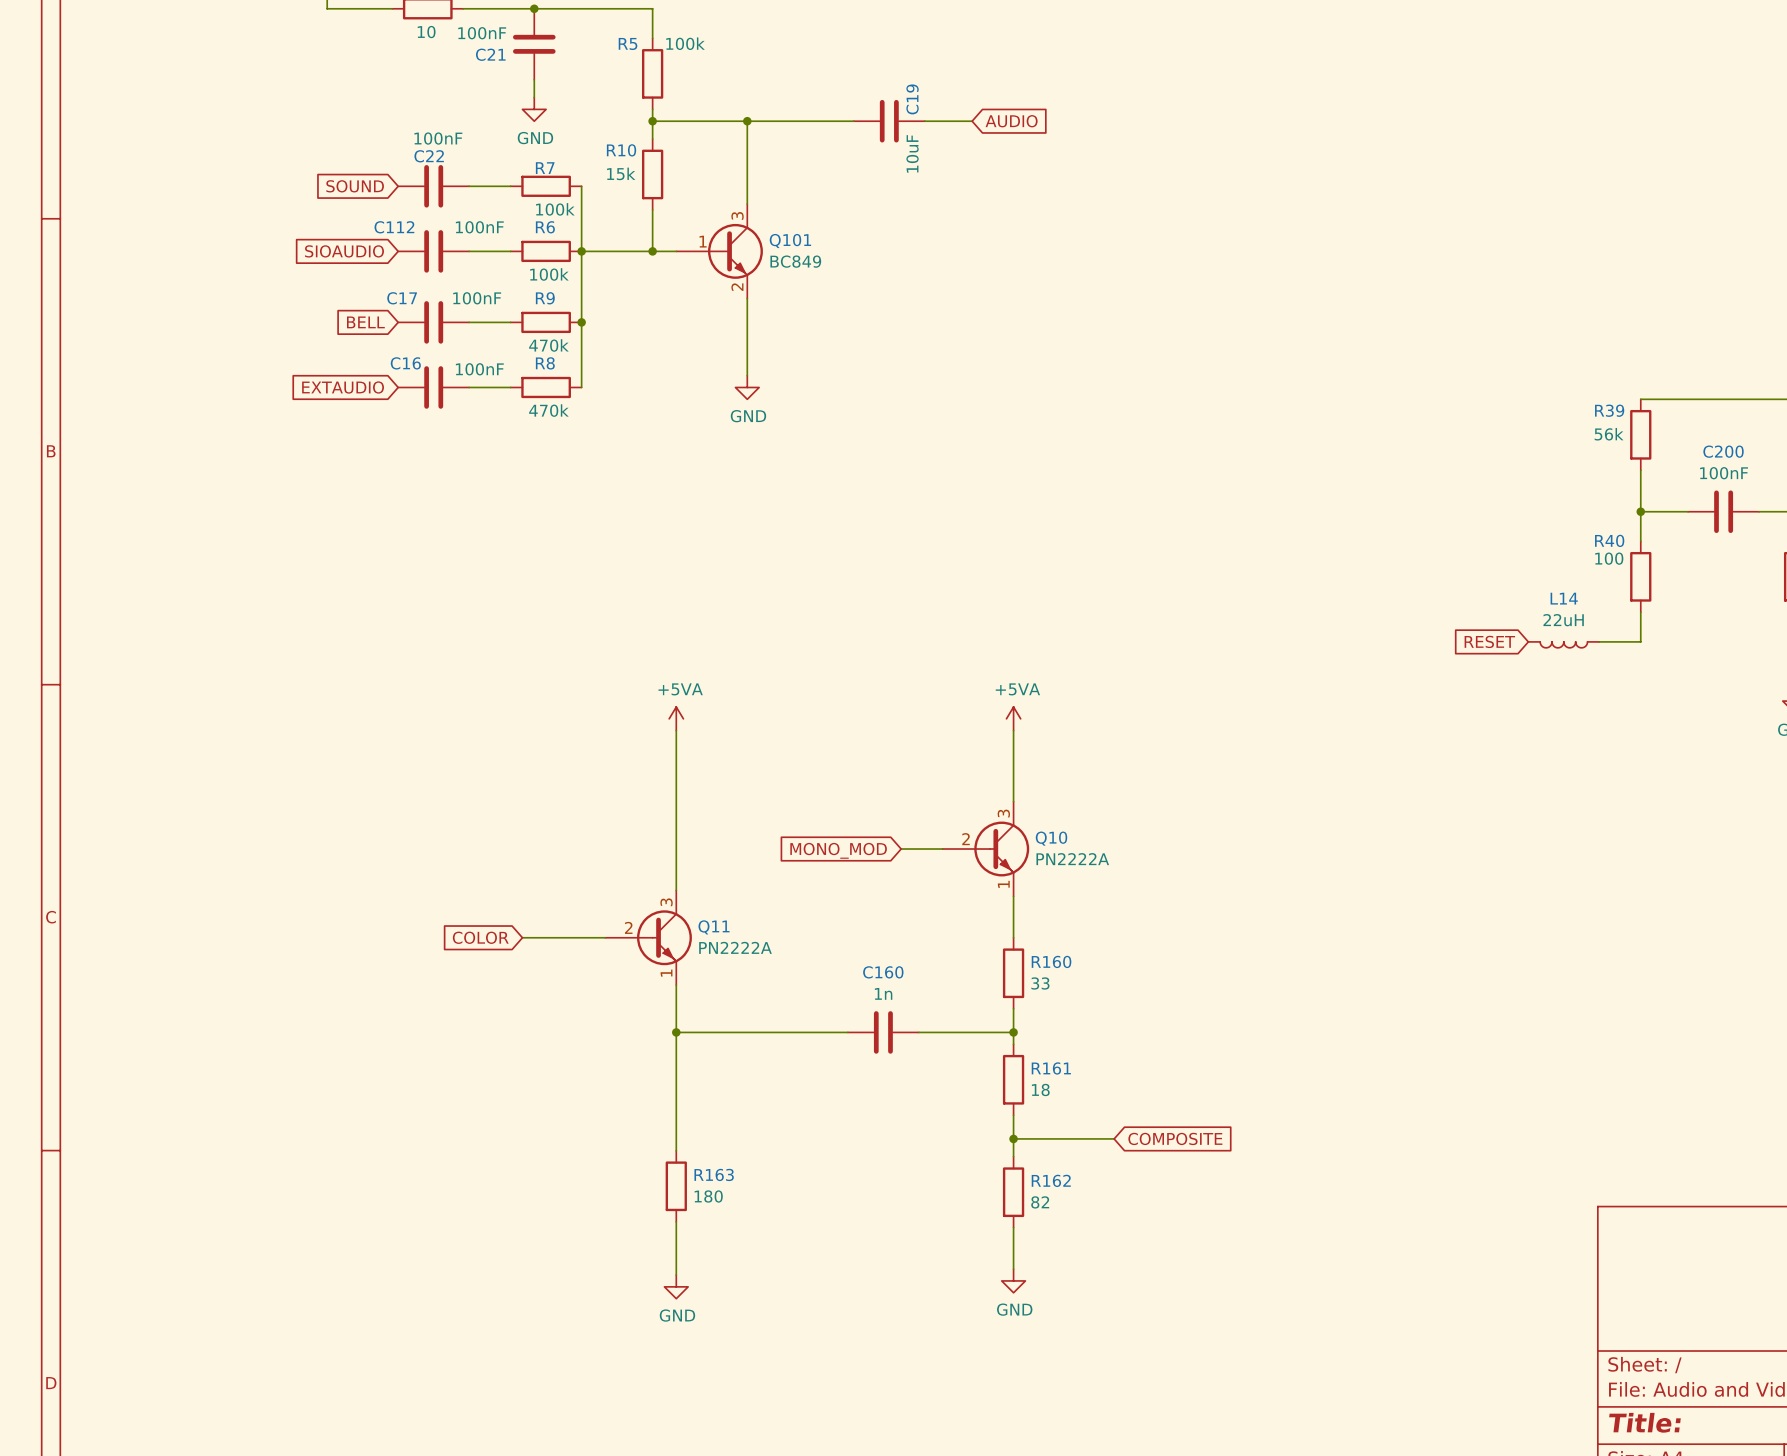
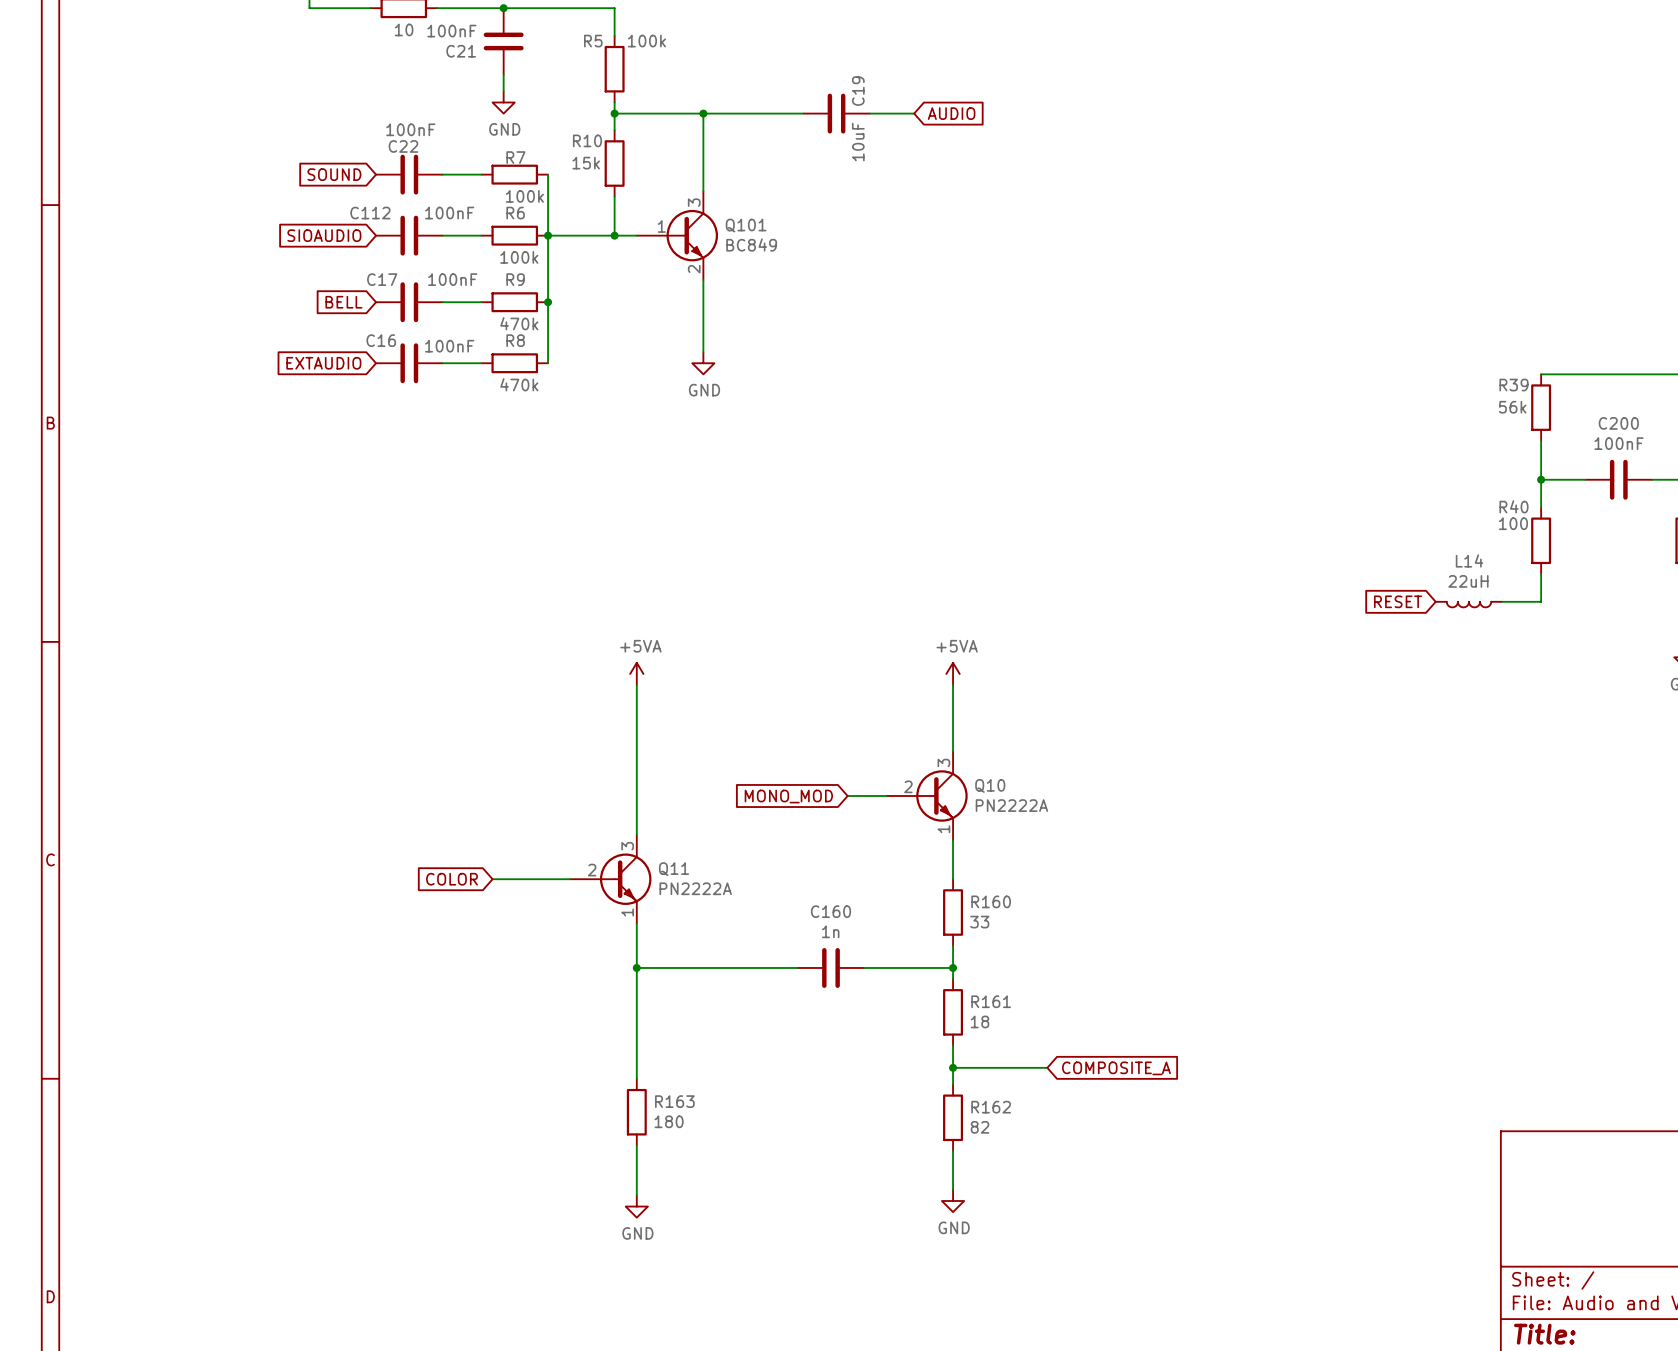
global label: COMPOSITE (1175, 1138) -> COMPOSITE_A (1116, 1068)

